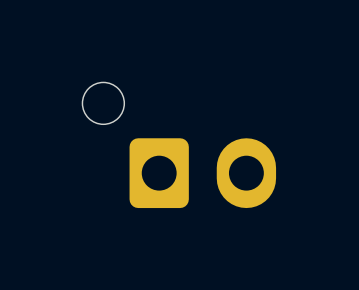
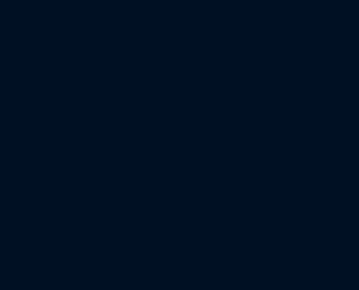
part: (179, 145) -> none

